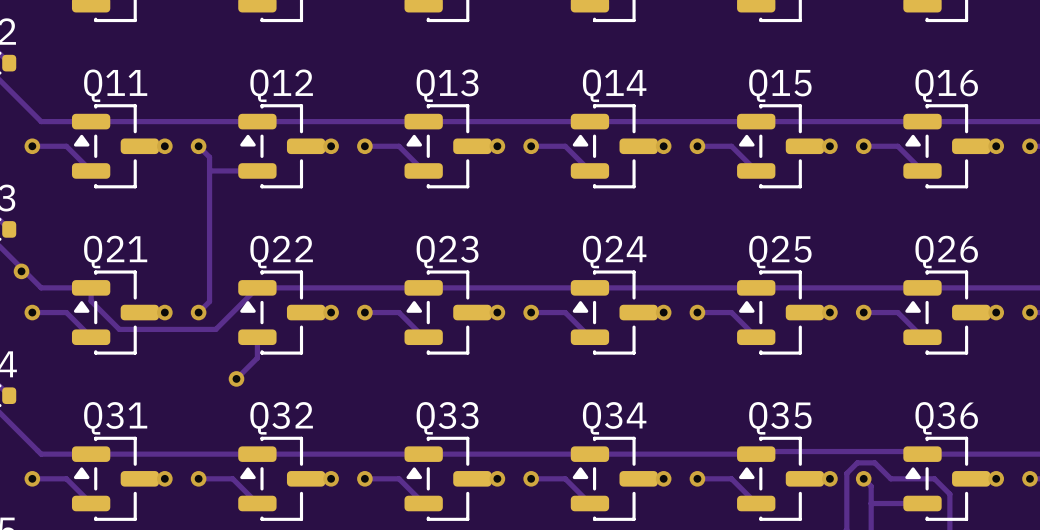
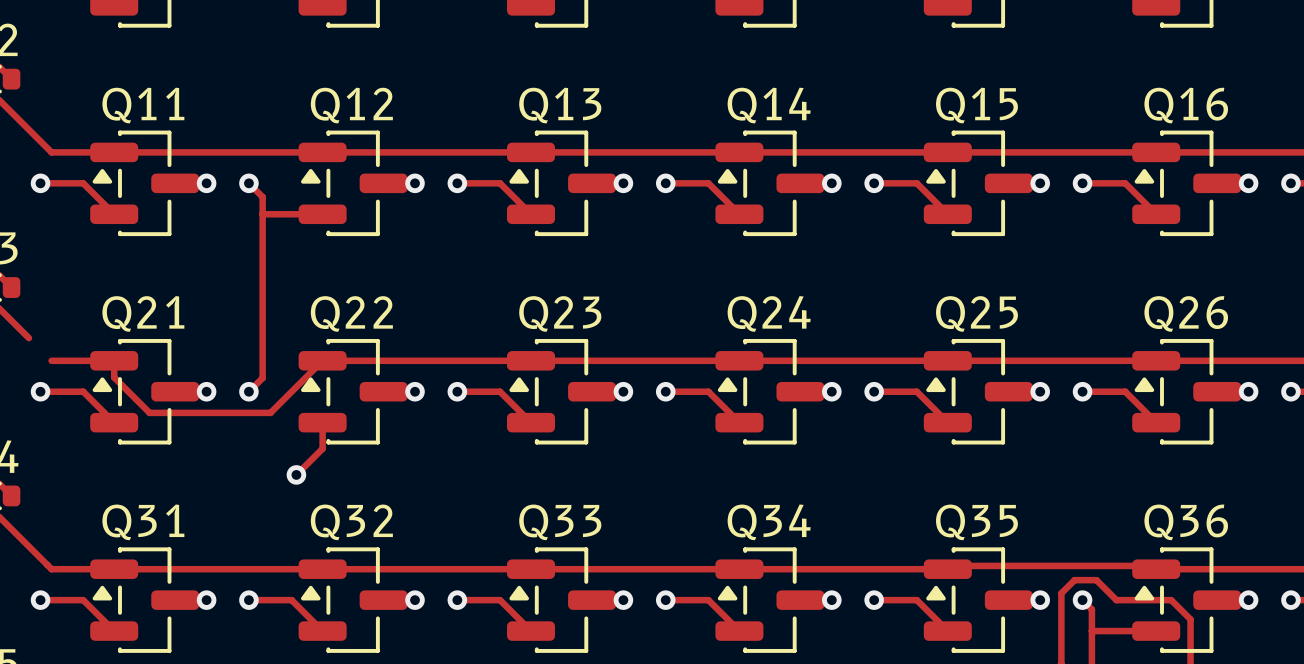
track: (21, 271) (23, 269) (41, 287) -> none
via: (21, 271) -> none

